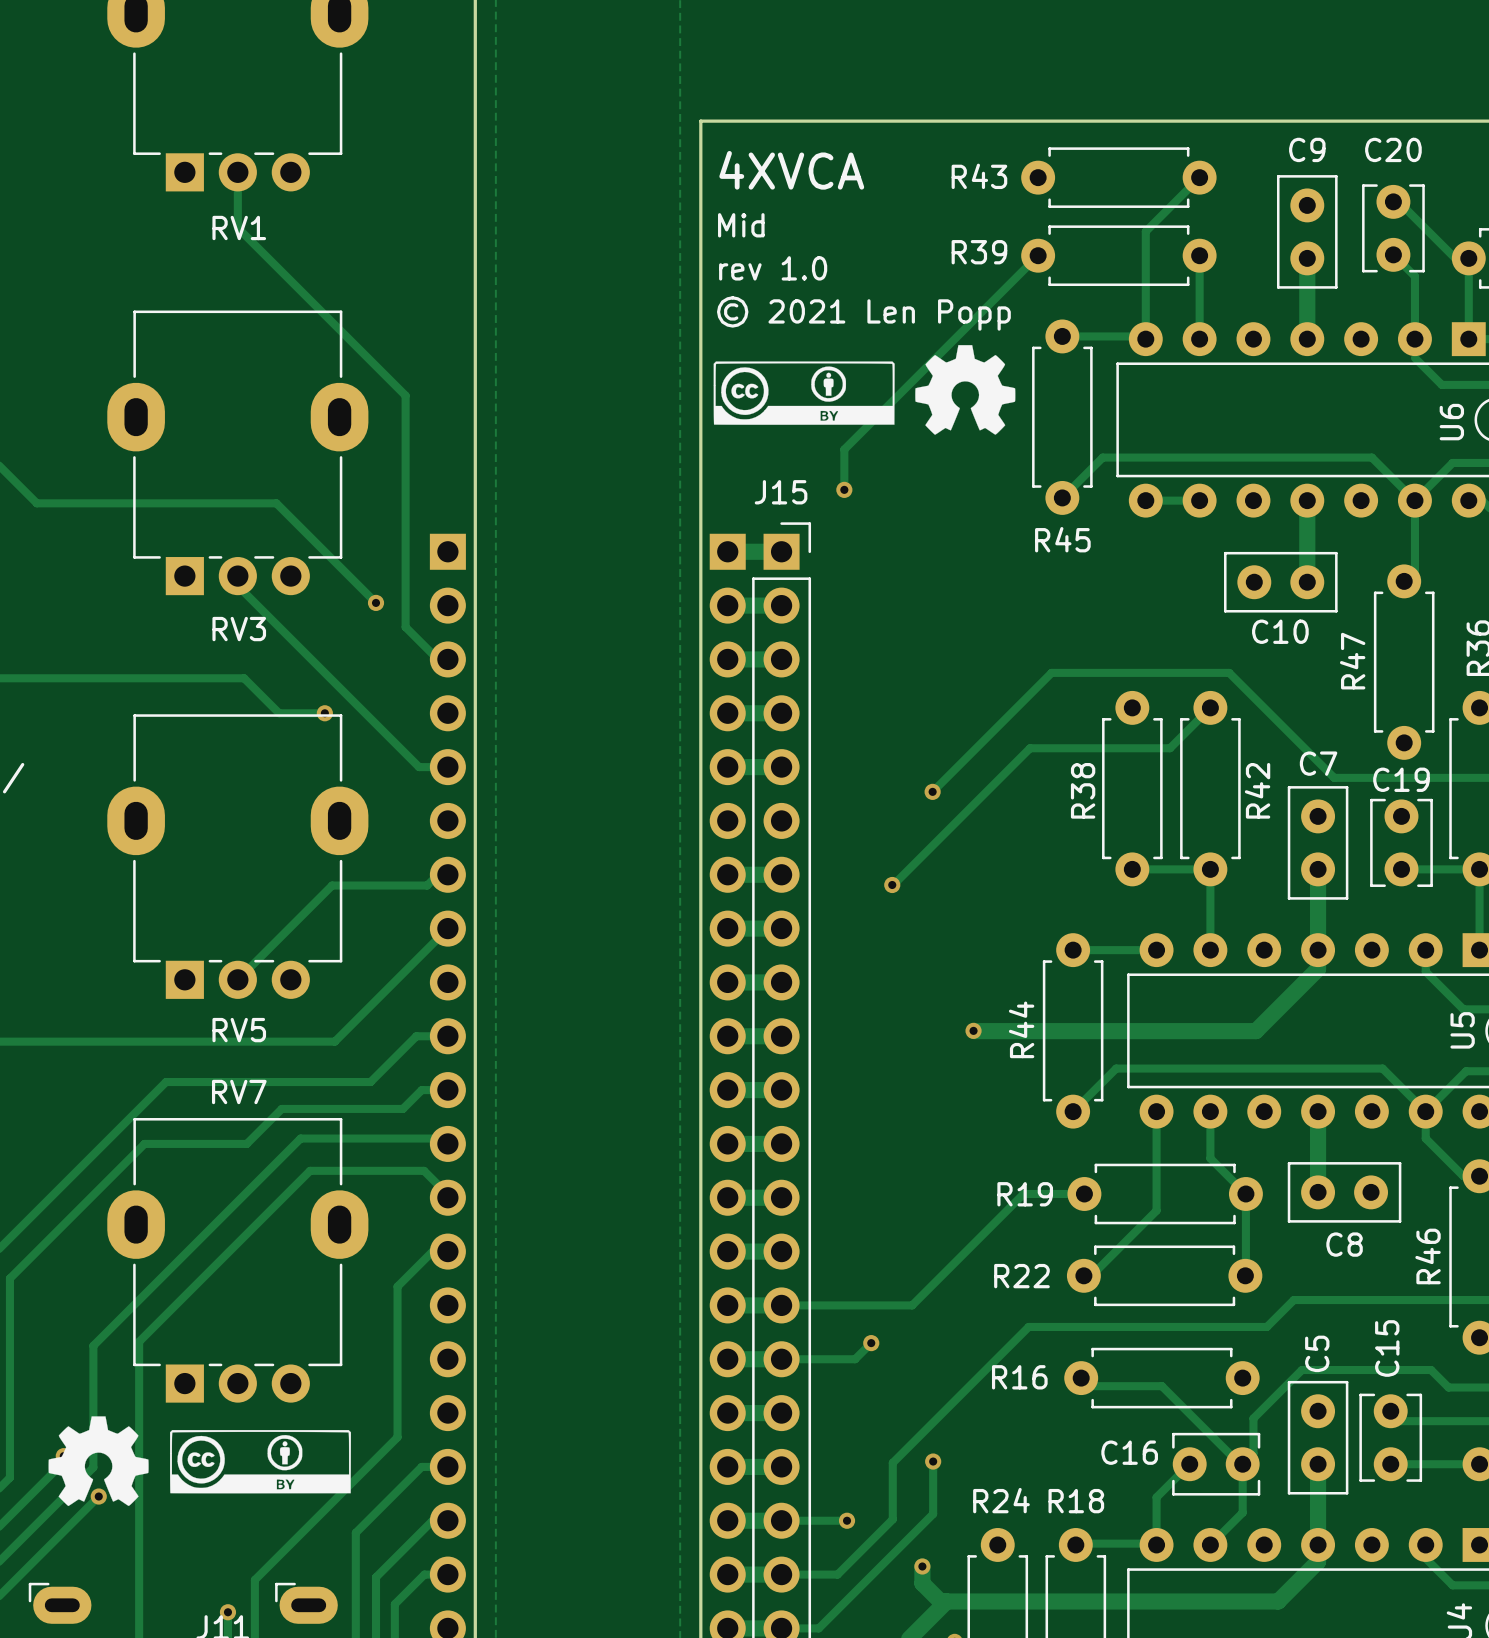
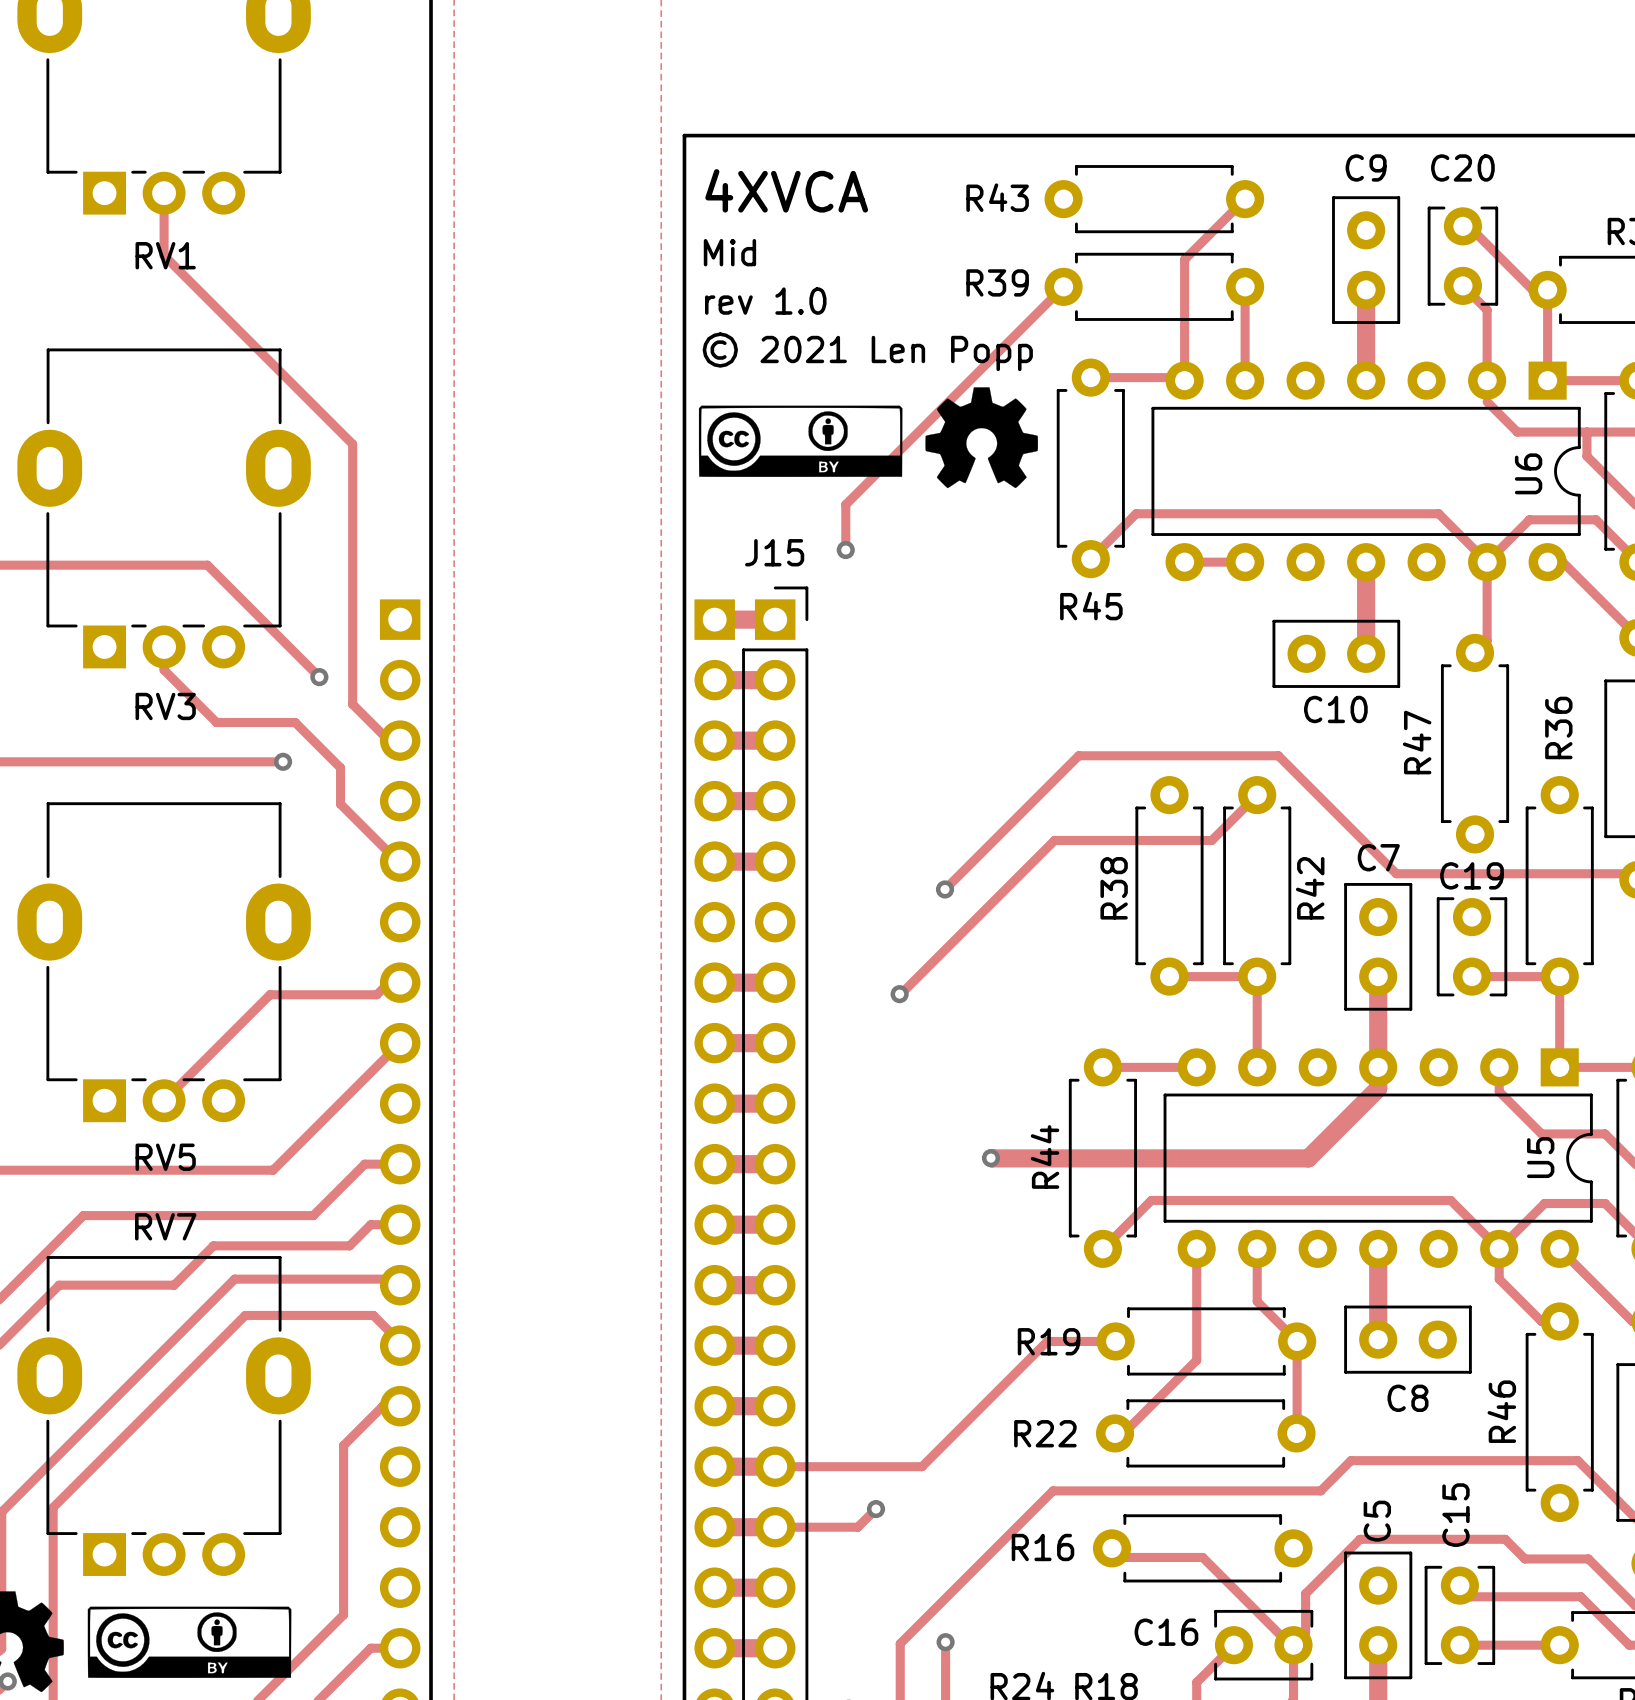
track: (237, 585) (419, 767) (445, 767) -> (164, 657) (164, 670) (216, 722) (295, 722) (340, 767) (340, 804) (398, 861)
track: (244, 678) (279, 713) (324, 713) -> (171, 761) (283, 761)
via position: (324, 713) -> (283, 761)

